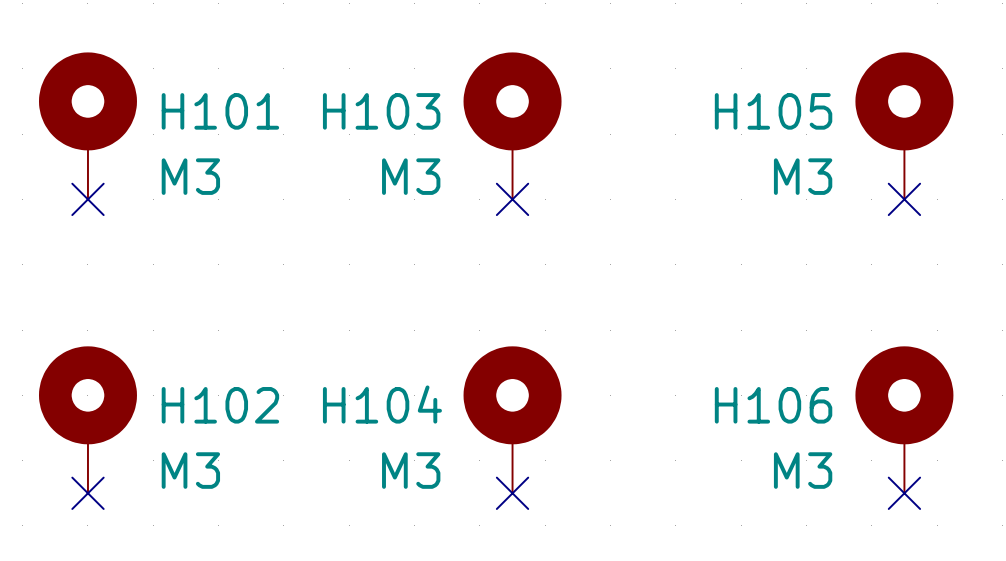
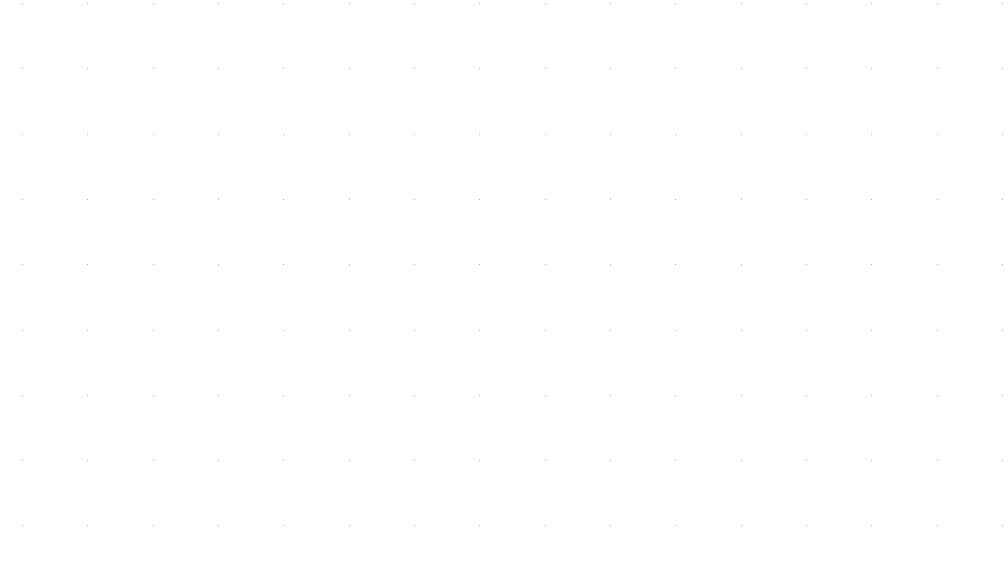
H101: M3 (87, 125) -> none
H103: M3 (512, 125) -> none
H105: M3 (904, 125) -> none
no-connect mark: (87, 199) -> none
no-connect mark: (512, 199) -> none
no-connect mark: (904, 199) -> none
H102: M3 (87, 419) -> none
H104: M3 (512, 419) -> none
H106: M3 (904, 419) -> none
no-connect mark: (87, 493) -> none
no-connect mark: (512, 493) -> none
no-connect mark: (904, 493) -> none

